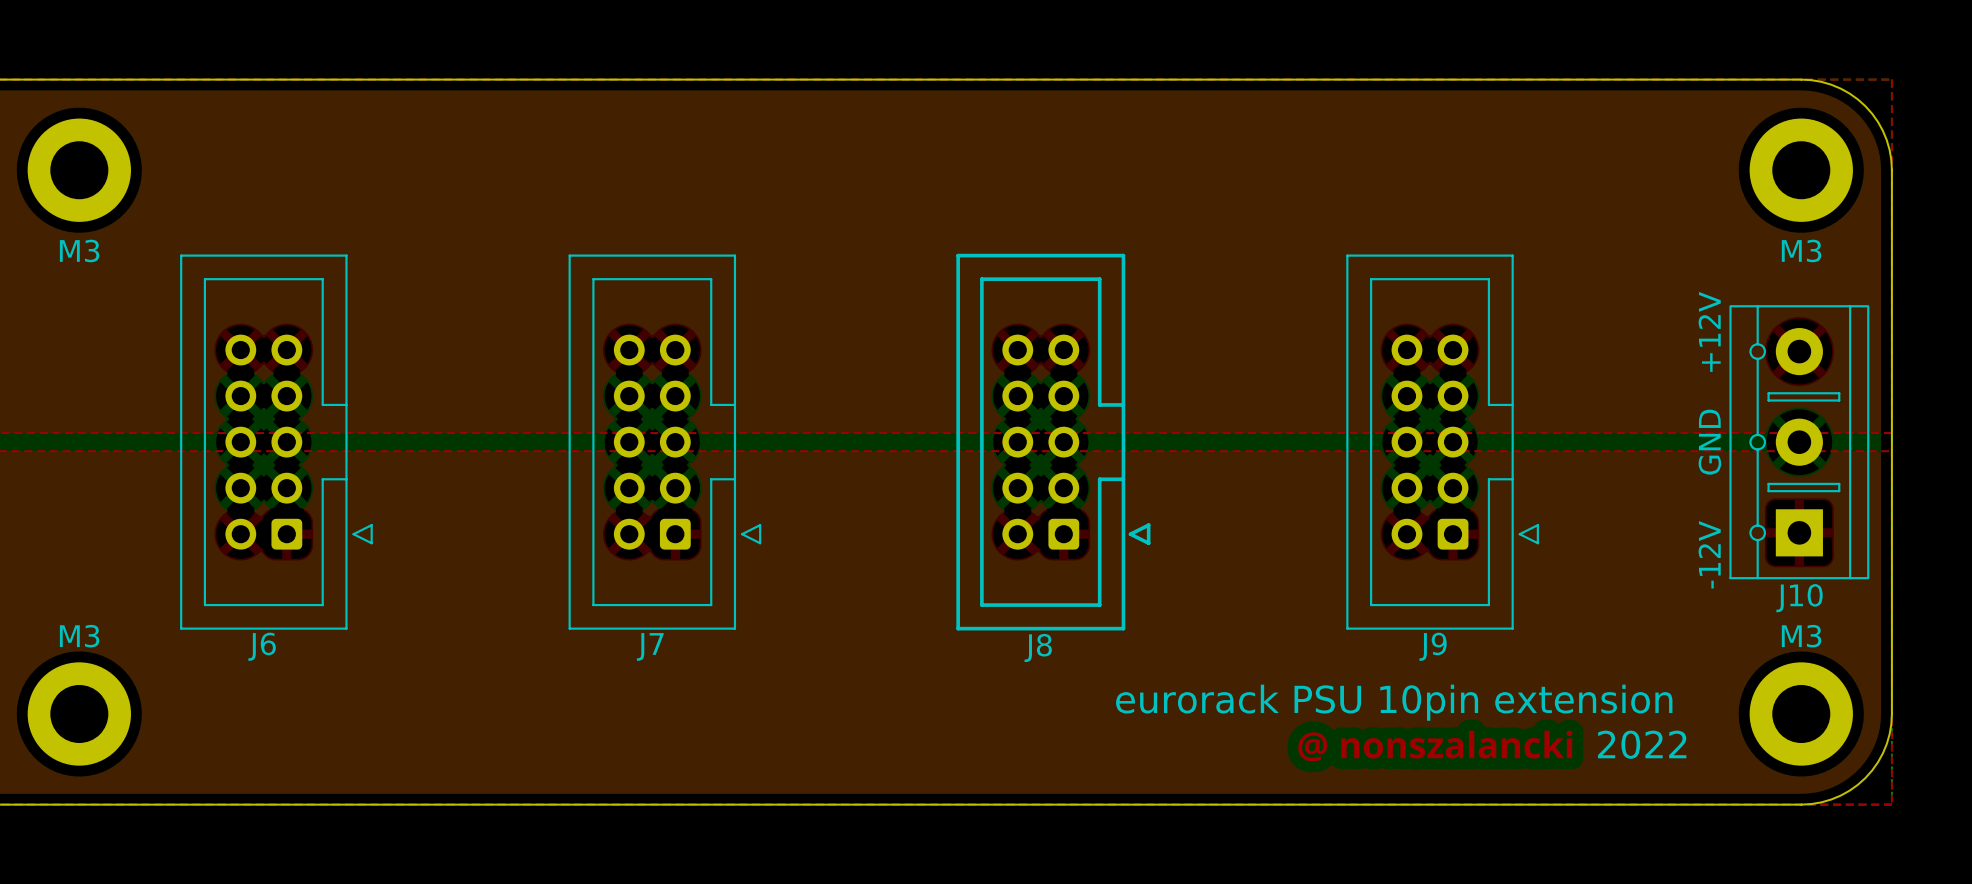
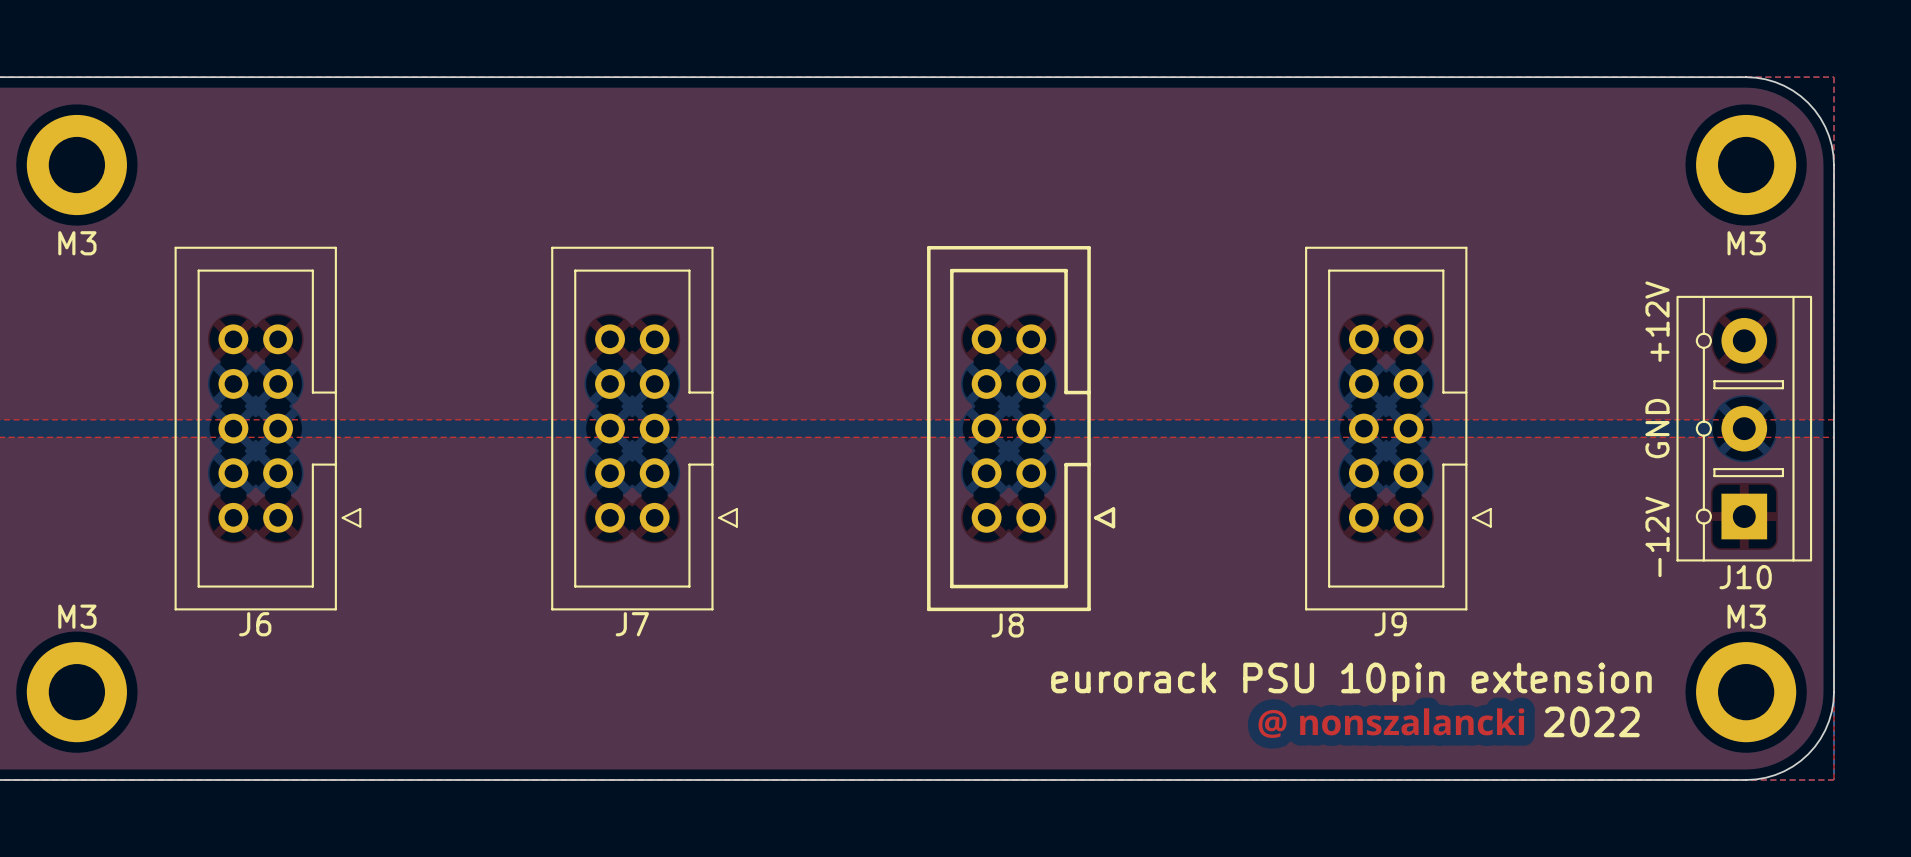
J8 footprint: [956, 253, 1151, 631] -> [927, 246, 1116, 612]
J6 footprint: [180, 254, 373, 630] -> [174, 246, 362, 611]
J7 footprint: [568, 254, 762, 630] -> [551, 246, 738, 611]
J9 footprint: [1346, 254, 1539, 630] -> [1305, 246, 1492, 611]

